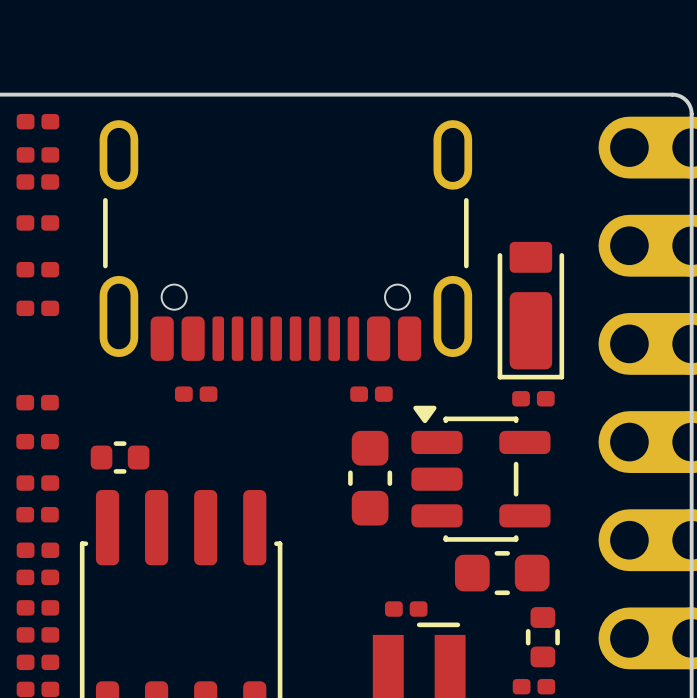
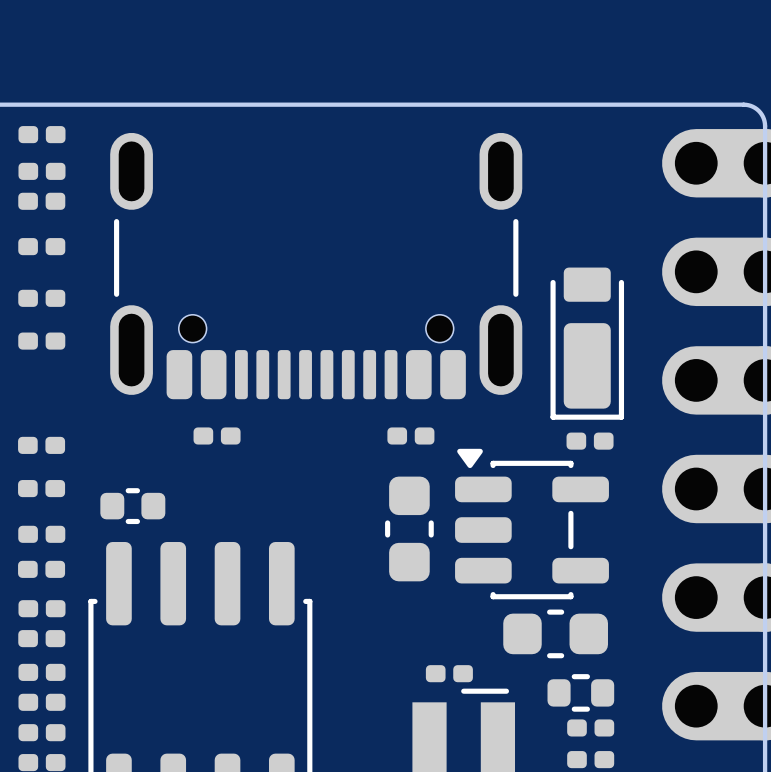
part rotation: 0° (542, 637) -> 90° clockwise (580, 692)
part: none -> (590, 727)

